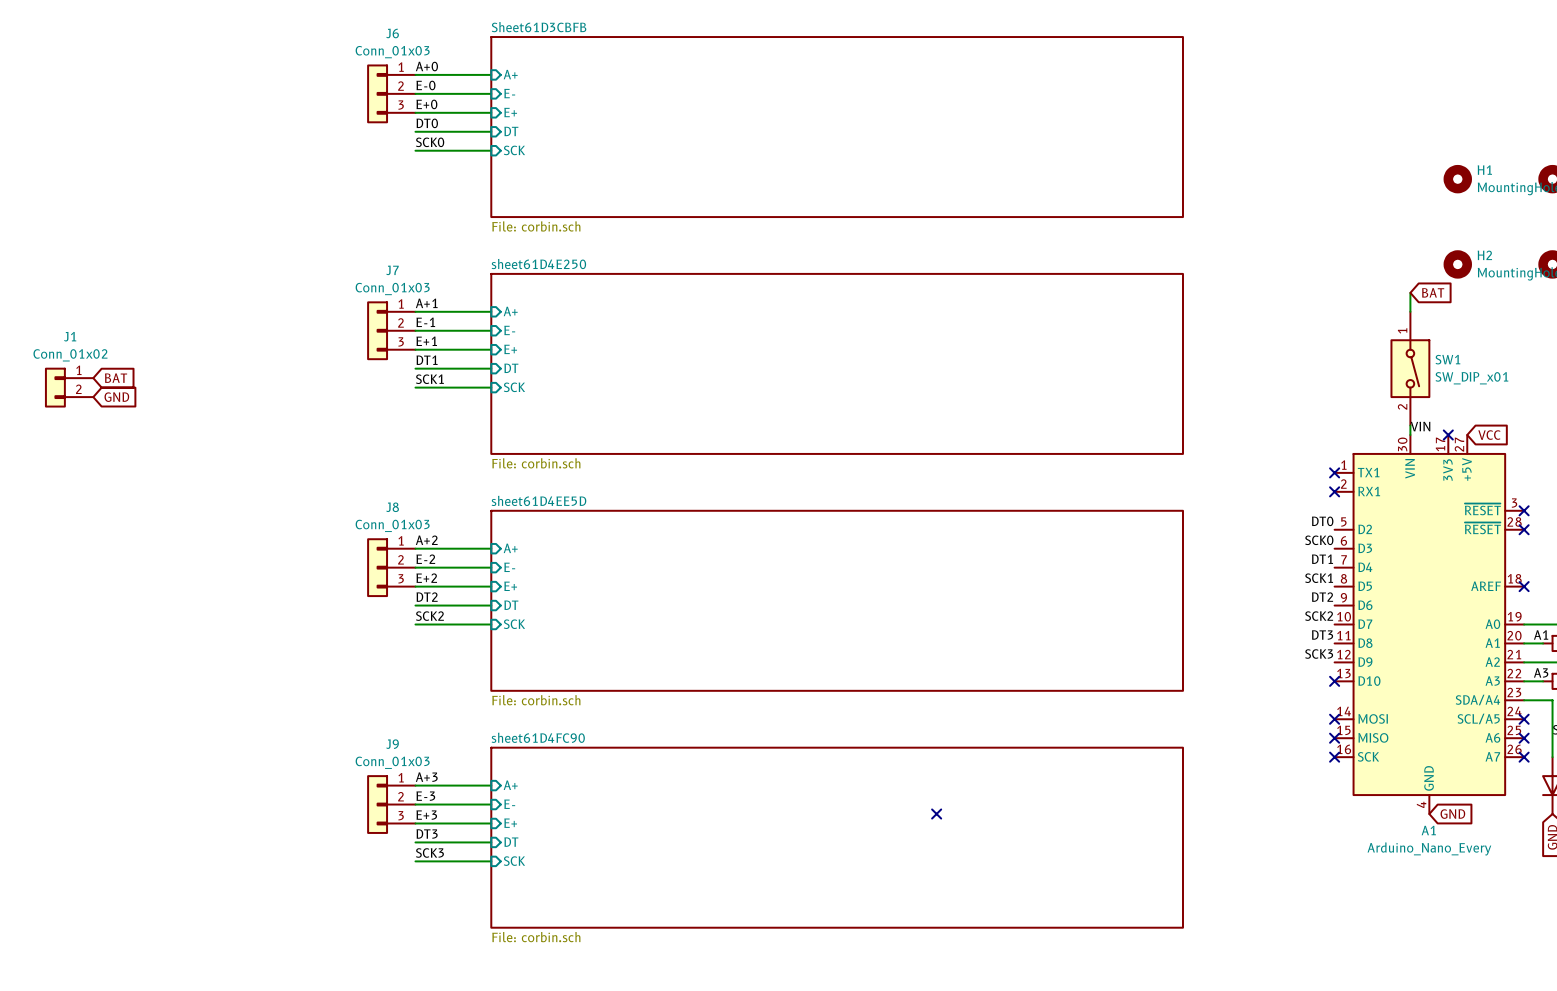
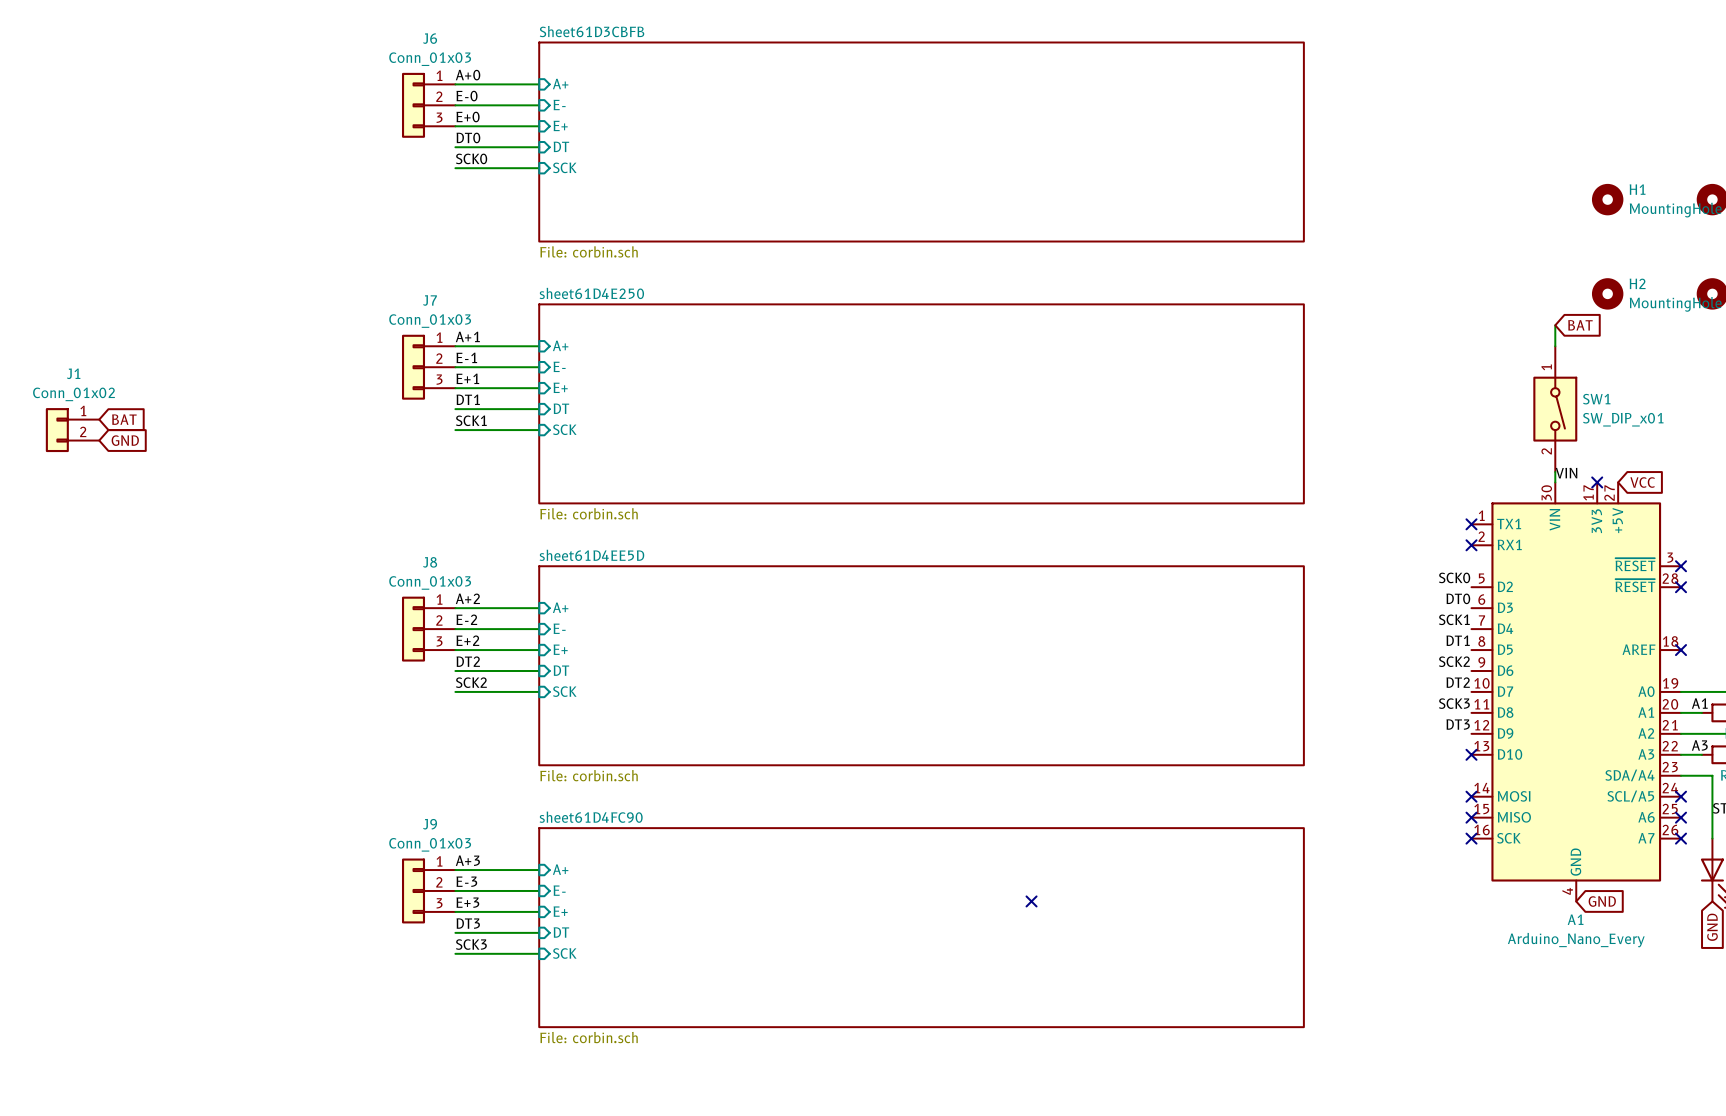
label: DT0 (1322, 521) -> SCK0 (1454, 577)
label: SCK0 (1319, 540) -> DT0 (1458, 598)
label: DT1 (1322, 559) -> SCK1 (1454, 619)
label: SCK1 (1319, 578) -> DT1 (1458, 640)
label: DT2 (1322, 597) -> SCK2 (1454, 661)
label: SCK2 (1319, 616) -> DT2 (1458, 682)
label: DT3 (1322, 635) -> SCK3 (1454, 703)
label: SCK3 (1319, 654) -> DT3 (1458, 724)

